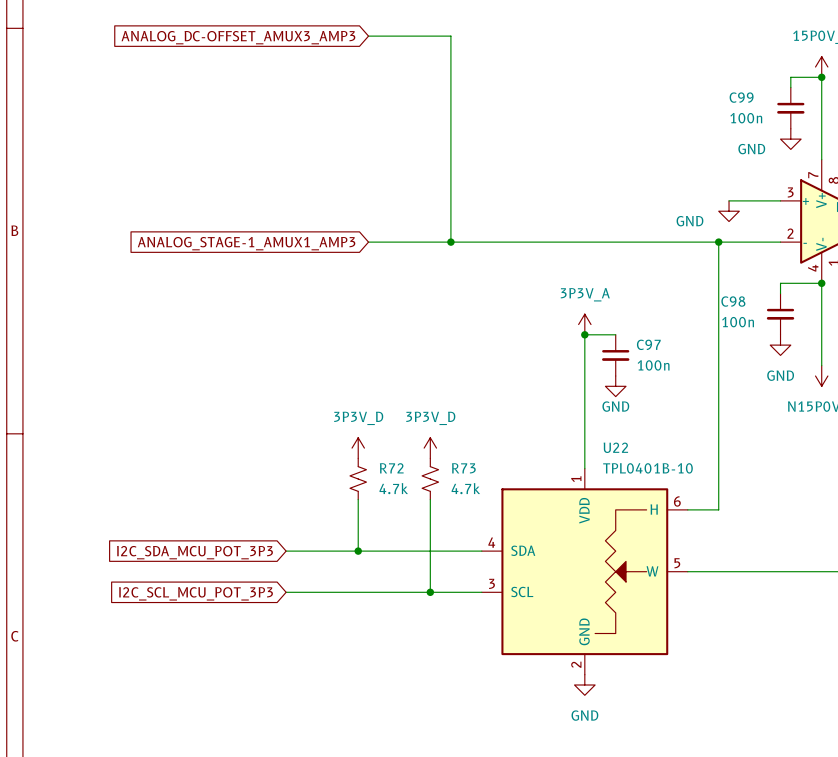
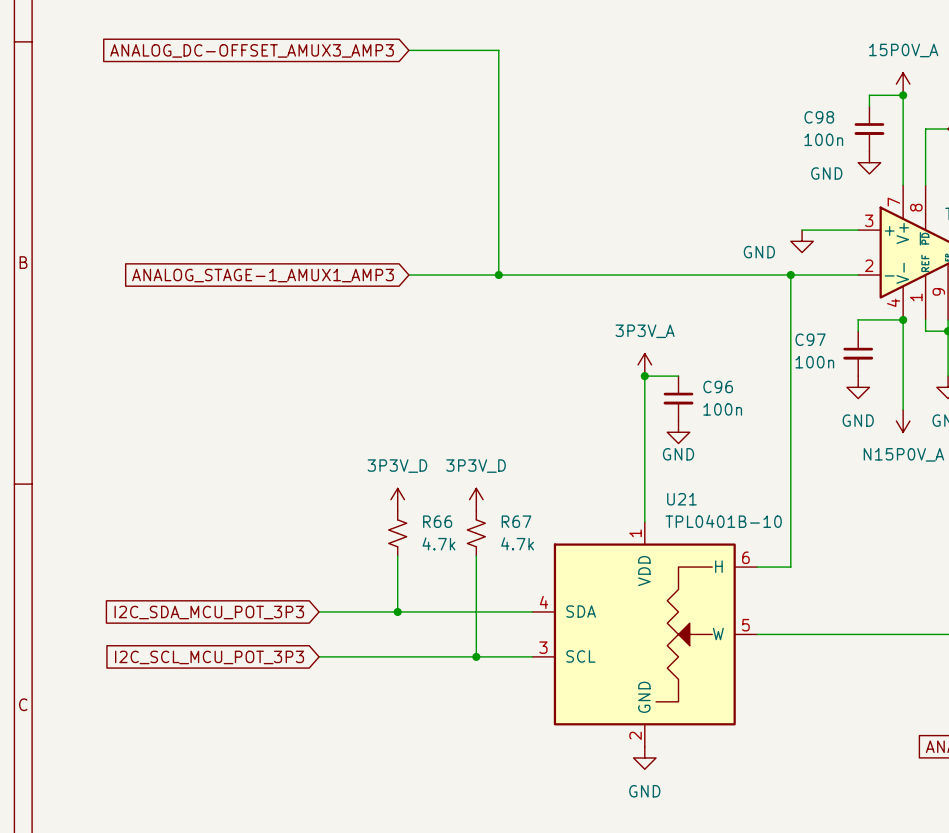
C99 name: C99 (741, 97) -> C98 (819, 117)
C98 name: C98 (733, 301) -> C97 (810, 339)
C97 name: C97 (648, 344) -> C96 (718, 386)
U22 name: U22 (615, 447) -> U21 (681, 499)
R72 name: R72 (391, 468) -> R66 (437, 521)
R73 name: R73 (463, 468) -> R67 (516, 521)

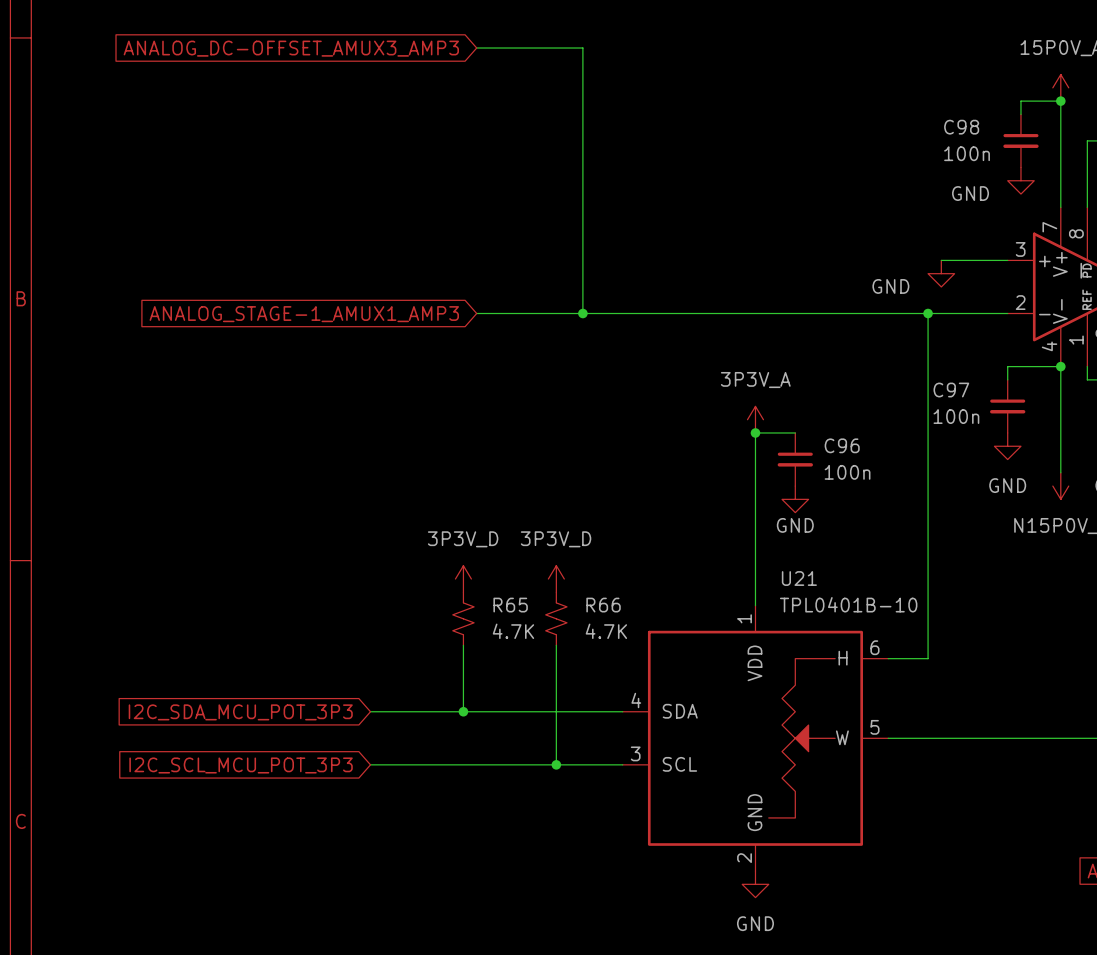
R66 name: R66 (437, 521) -> R65 (510, 605)
R67 name: R67 (516, 521) -> R66 (603, 605)
R66 value: 4.7k (438, 543) -> 4.7K (513, 631)
R67 value: 4.7k (517, 543) -> 4.7K (606, 631)

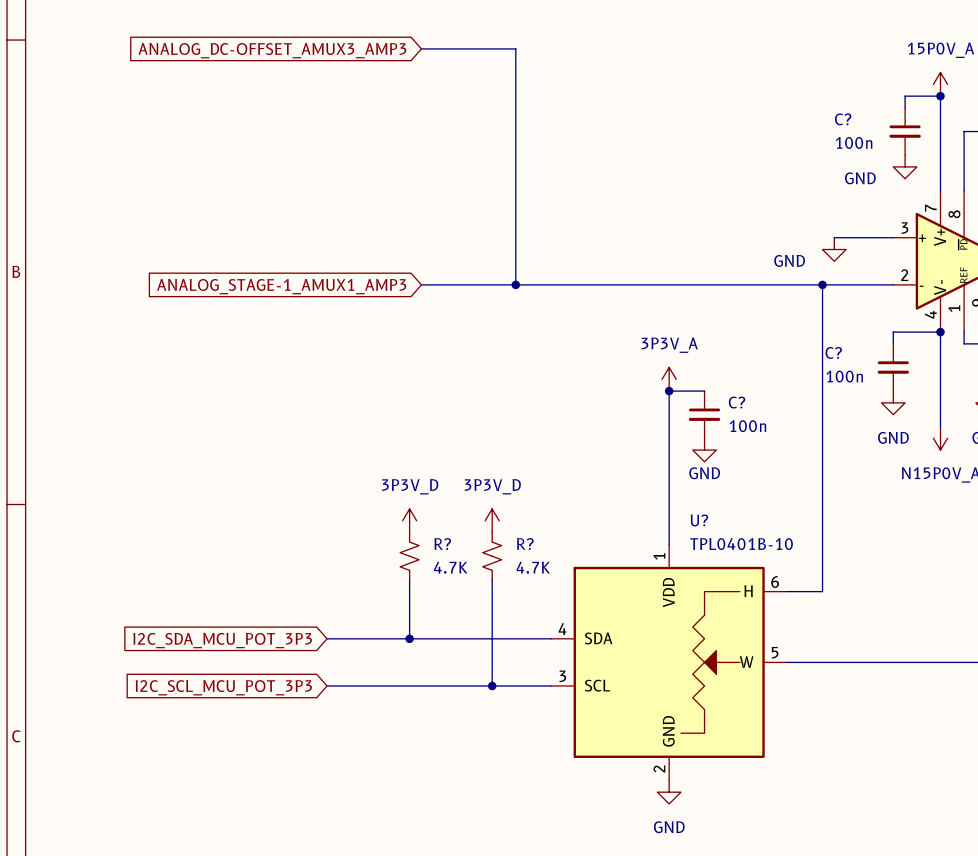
C98 name: C98 (961, 127) -> C? (843, 119)
C97 name: C97 (951, 390) -> C? (833, 352)
C96 name: C96 (842, 445) -> C? (737, 402)
U21 name: U21 (799, 578) -> U? (699, 520)
R65 name: R65 (510, 605) -> R? (442, 544)
R66 name: R66 (603, 605) -> R? (525, 544)

